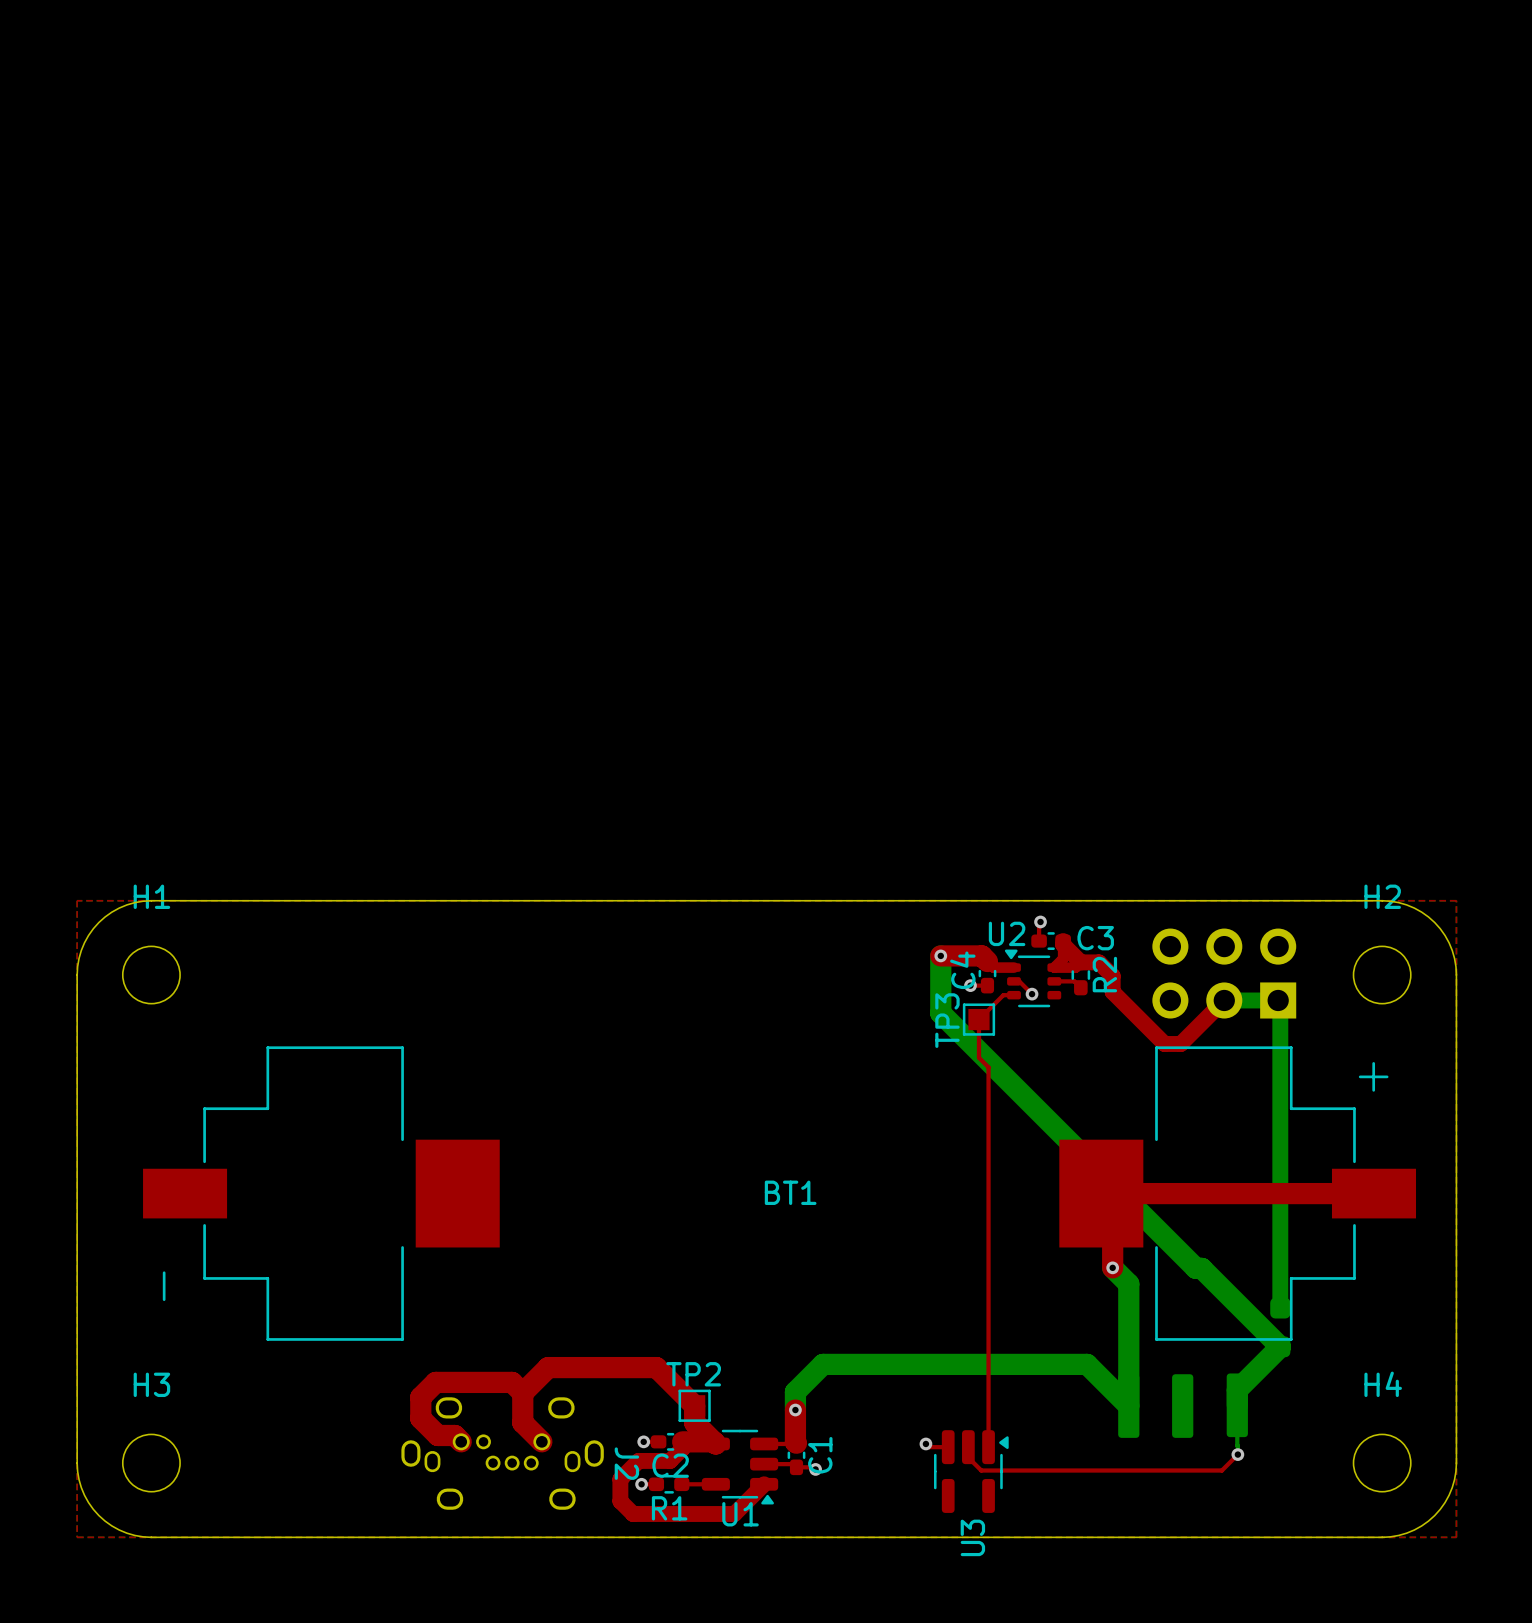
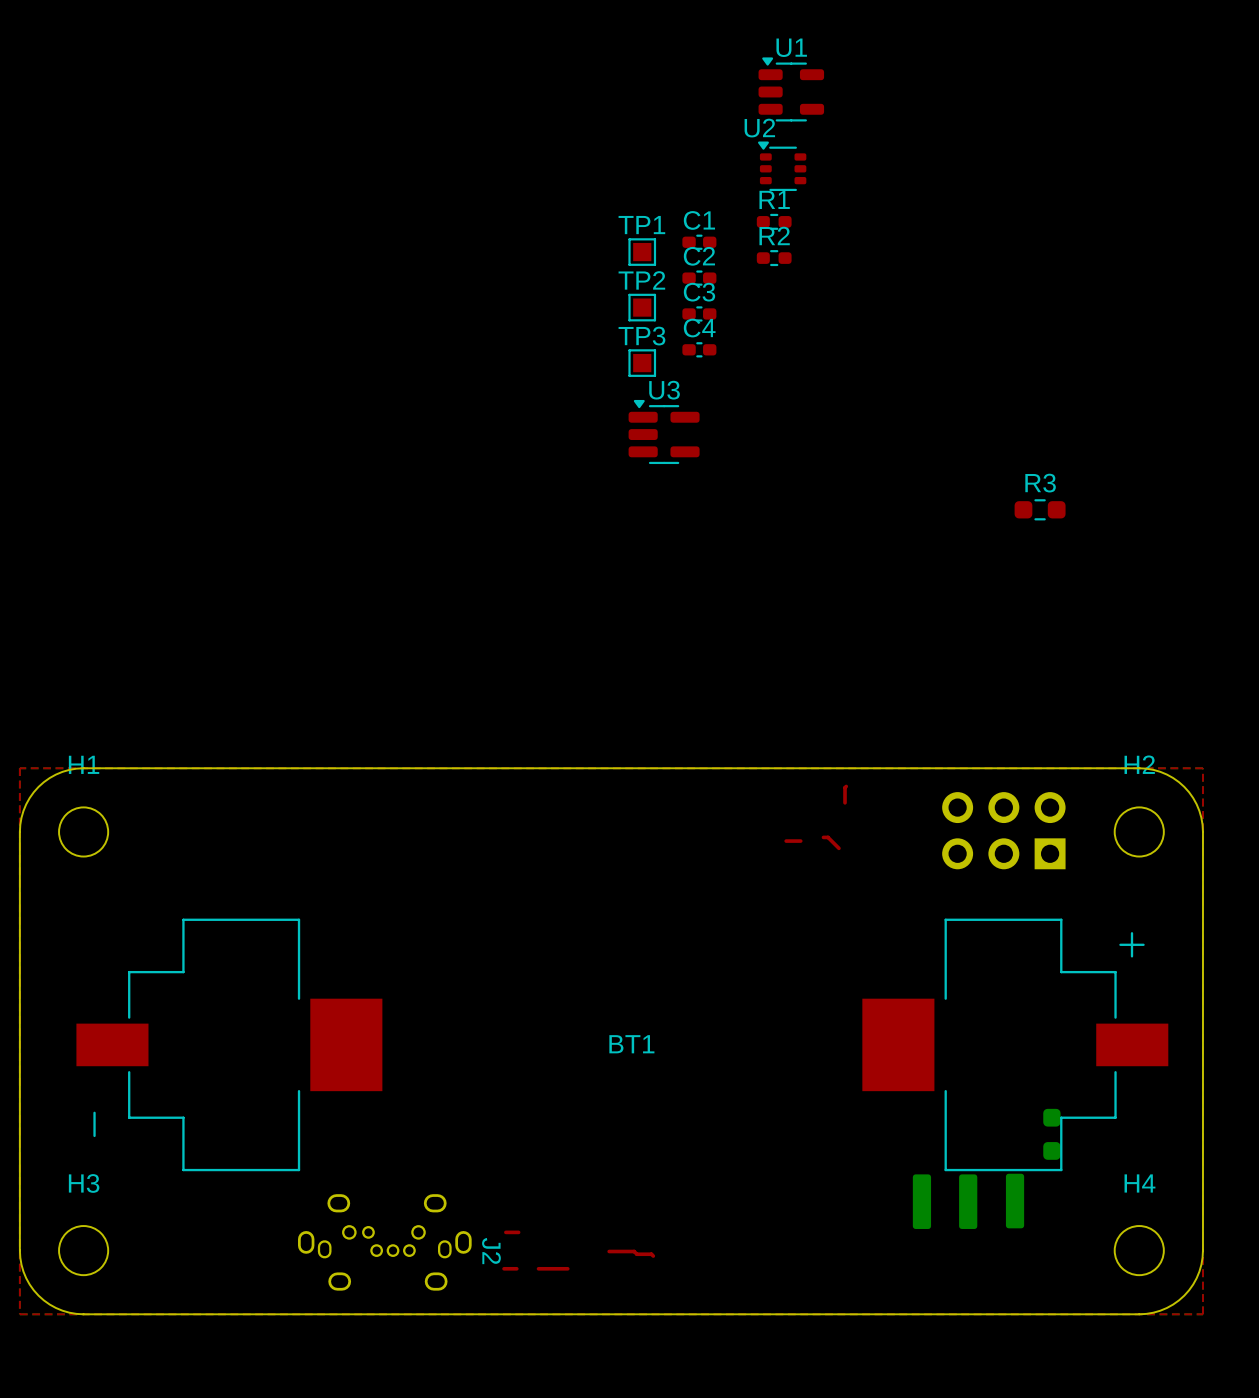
TP1: none -> (642, 252)
R3: none -> (1040, 509)
via: (1040, 921) -> none
C3 name position: C3 (1095, 938) -> C3 (699, 292)
C3 position: (1051, 941) -> (699, 313)
top track: (940, 955) (981, 955) (993, 967) (1014, 967) -> none
bottom track: (940, 955) (940, 1013) (1195, 1268) (1201, 1268) (1280, 1346) (1237, 1389) (1237, 1454) -> none
via: (940, 955) -> none
top track: (1080, 962) (1063, 944) (1063, 941) (1063, 958) (1054, 967) (1075, 967) (1080, 962) -> none
top track: (1080, 962) (1098, 962) (1112, 976) (1112, 991) (1164, 1043) (1180, 1043) (1224, 1000) -> none
C4 rotation: 0° (987, 973) -> 90° clockwise (699, 349)
C4 position: (987, 973) -> (699, 349)
R2 rotation: 0° (1080, 975) -> 90° clockwise (774, 258)
R2 position: (1080, 975) -> (774, 258)
U2 position: (1033, 978) -> (782, 166)
top track: (1054, 981) (1074, 981) (1080, 987) -> none
via: (970, 985) -> none
via: (1032, 994) -> none
top track: (1014, 995) (1003, 995) (978, 1019) (978, 1057) (988, 1067) (988, 1447) -> none
bottom track: (1224, 1000) (1278, 1000) (1280, 1002) (1280, 1308) -> none
TP3 position: (978, 1019) -> (642, 363)
TP3 name rotation: 0° (947, 1020) -> 90° clockwise (641, 336)
BT1 position: (779, 1193) -> (622, 1044)
top track: (1373, 1193) (1101, 1193) (1112, 1204) (1112, 1267) -> none
bottom track: (1112, 1267) (1128, 1283) (1128, 1406) (1087, 1364) (823, 1364) (795, 1391) (795, 1410) -> none
via: (1112, 1267) -> none
top track: (522, 1393) (522, 1422) (541, 1441) -> none
top track: (522, 1393) (512, 1382) (435, 1382) (420, 1397) (420, 1418) (437, 1435) (454, 1435) (461, 1441) -> none
top track: (522, 1393) (548, 1367) (656, 1367) (694, 1405) (694, 1422) (715, 1443) -> none
TP2 position: (694, 1405) -> (642, 307)
top track: (795, 1410) (796, 1443) (764, 1443) -> none
via: (795, 1410) -> none
via: (643, 1441) -> none
C2 position: (670, 1441) -> (699, 278)
top track: (713, 1441) (682, 1441) (682, 1448) (670, 1460) (638, 1460) (620, 1479) (620, 1501) (633, 1514) (734, 1514) (764, 1484) -> none
top track: (925, 1443) (929, 1447) (948, 1447) -> none
via: (925, 1443) -> none
top track: (968, 1447) (968, 1457) (981, 1470) (1221, 1470) (1237, 1454) -> none
via: (1237, 1454) -> none
C1 rotation: 0° (796, 1455) -> 90° clockwise (699, 242)
C1 position: (796, 1455) -> (699, 242)
C2 name position: C2 (670, 1465) -> C2 (699, 256)
U1 rotation: 0° (740, 1467) -> 180° (791, 89)
U1 position: (740, 1467) -> (791, 89)
via: (815, 1469) -> none
U3 rotation: 0° (971, 1471) -> 90° counterclockwise (664, 431)
U3 position: (971, 1471) -> (664, 431)
via: (641, 1484) -> none
R1 position: (669, 1484) -> (774, 221)
R1 name position: R1 (669, 1508) -> R1 (774, 199)
U3 name position: U3 (972, 1537) -> U3 (664, 390)

